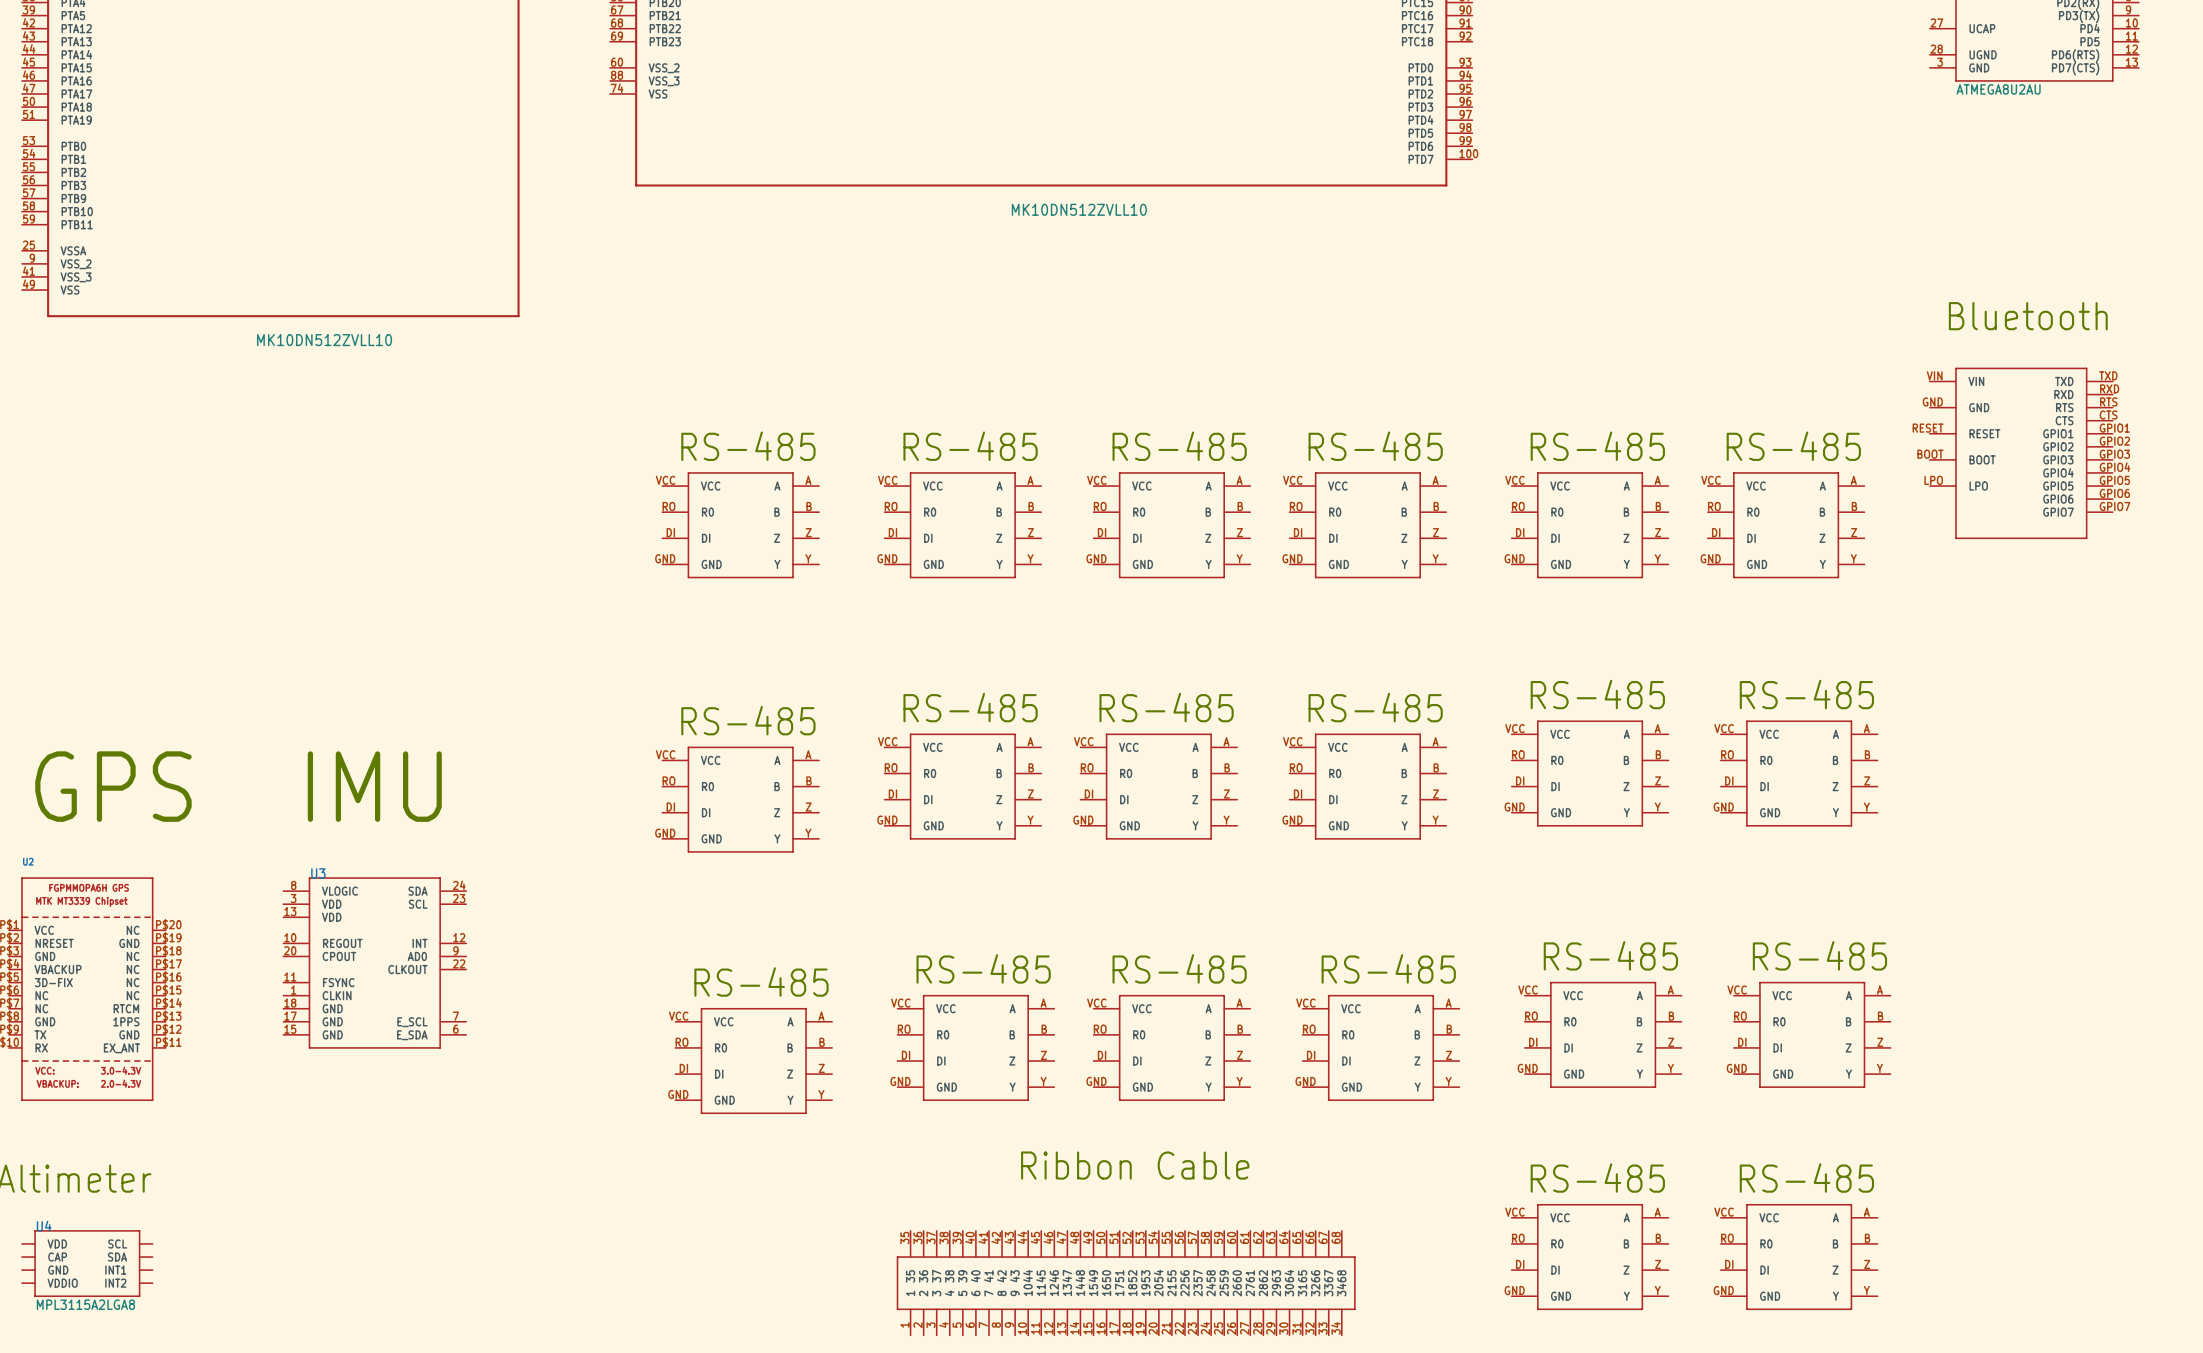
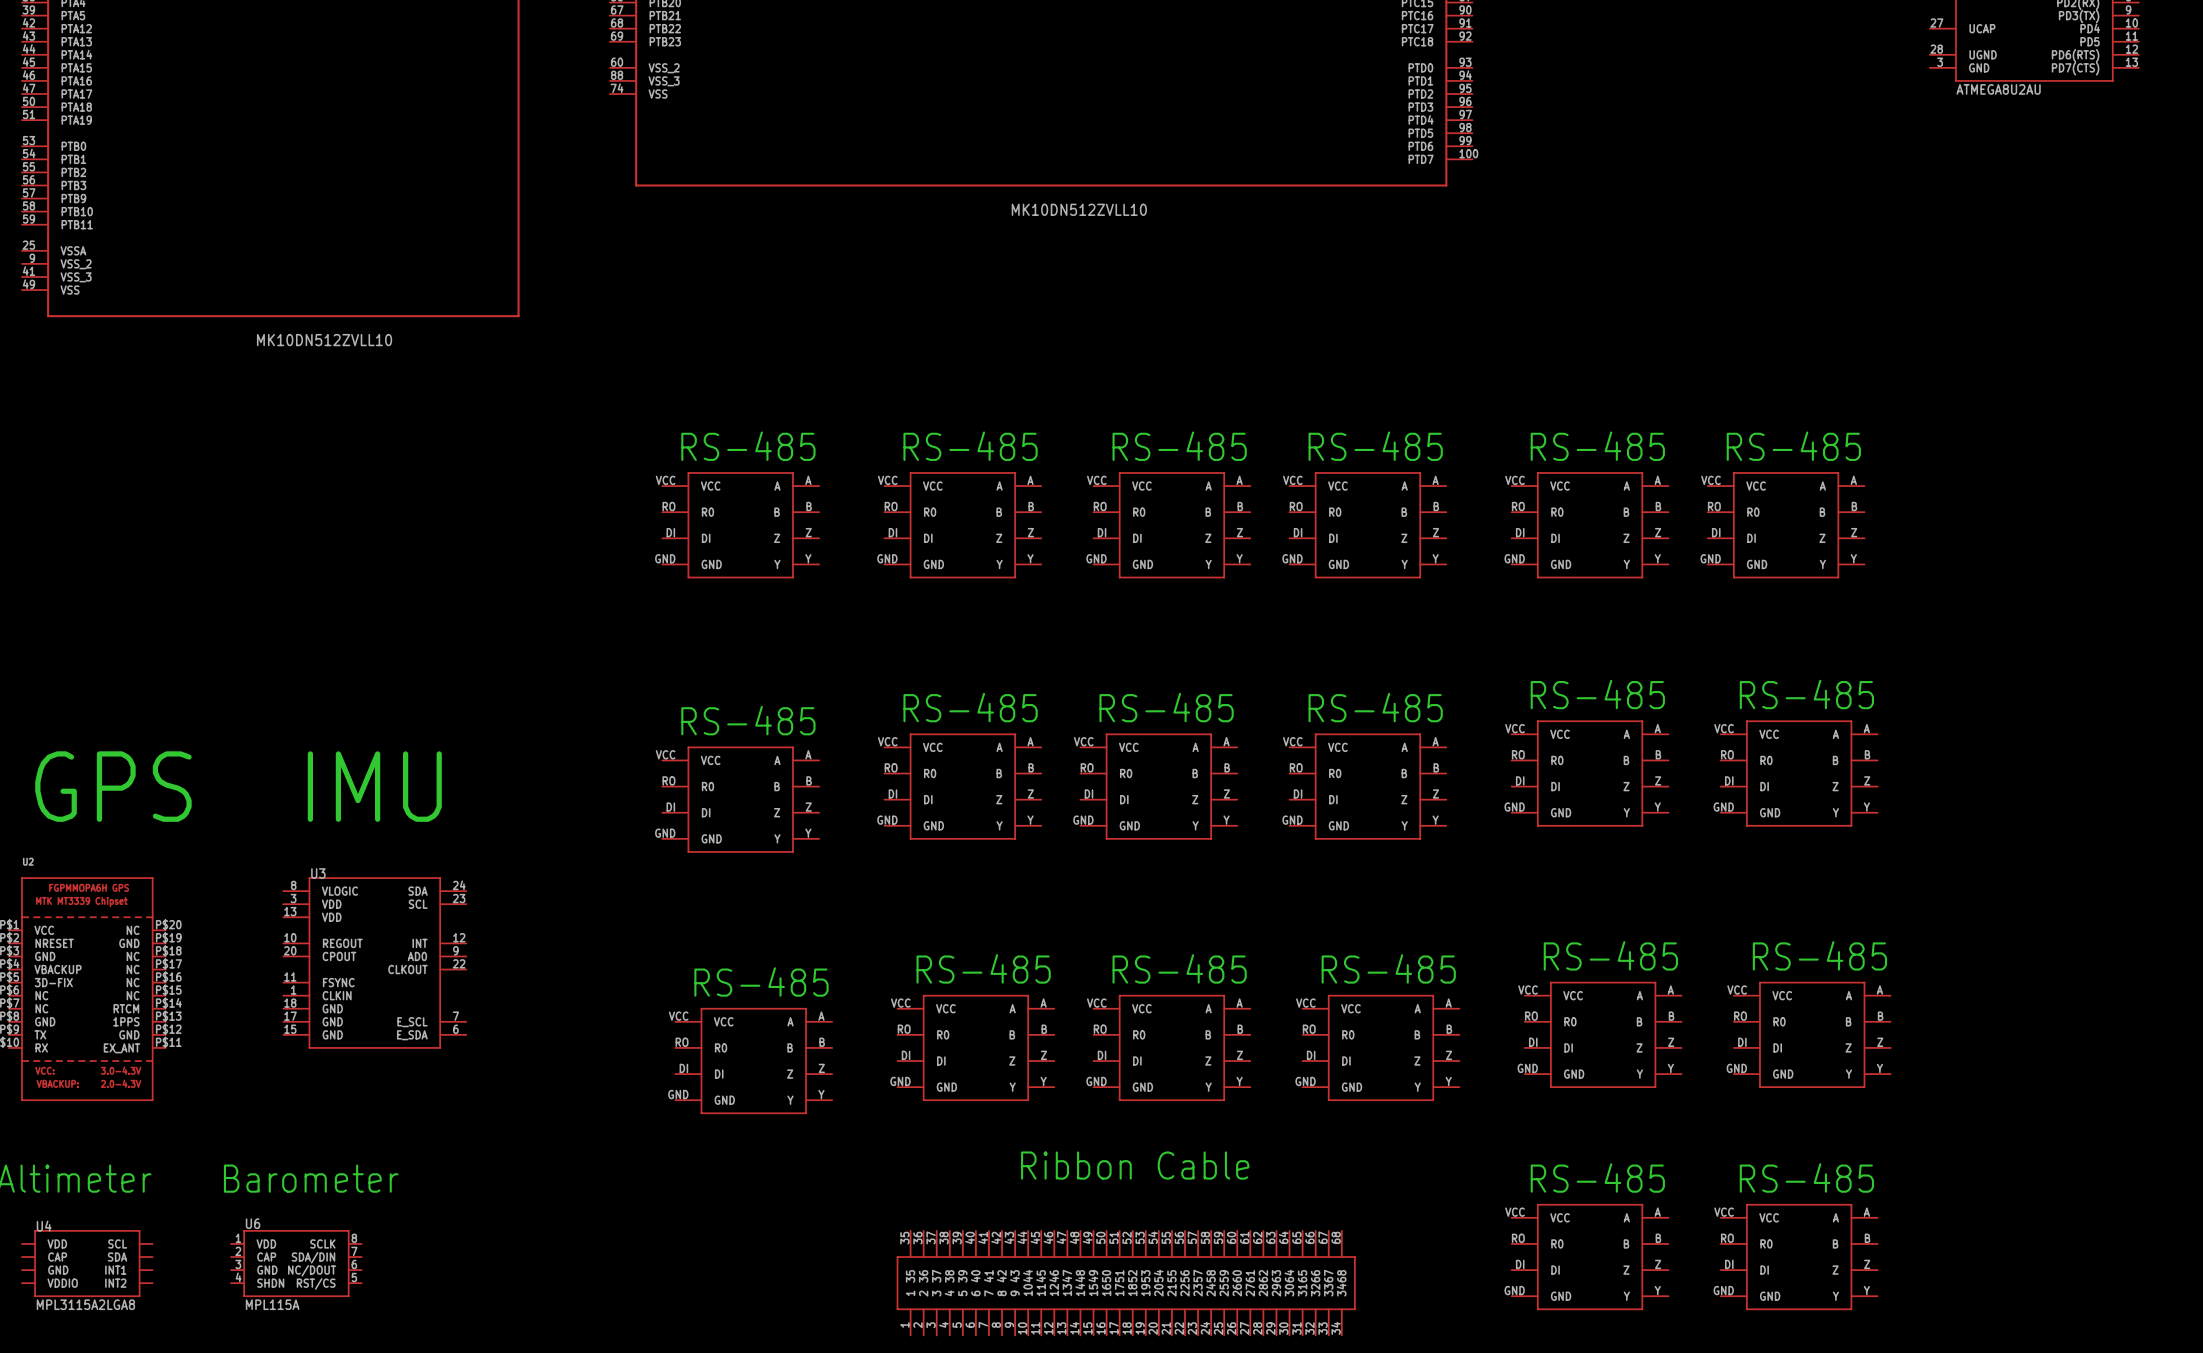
text: Bluetooth (2028, 316) -> none
part: (2021, 453) -> none
text: none -> Barometer (311, 1178)
U6: none -> MPL115A (296, 1263)

